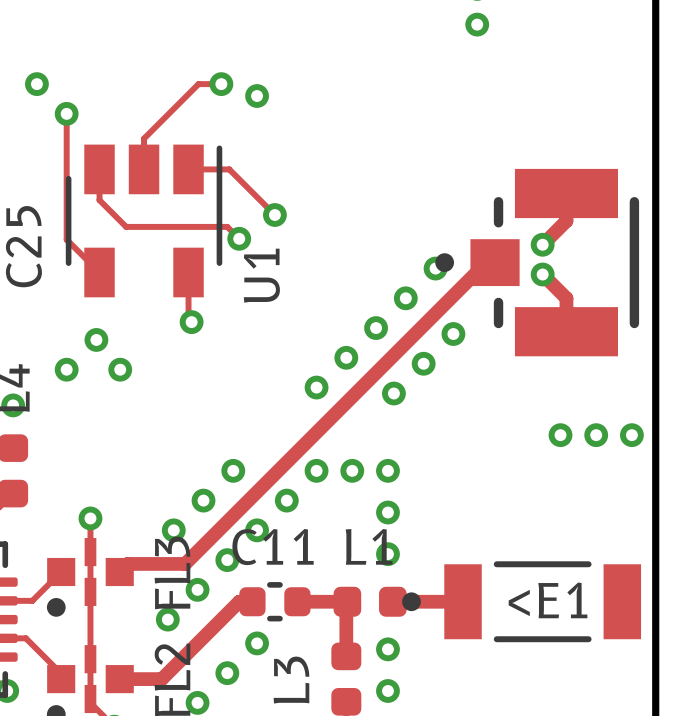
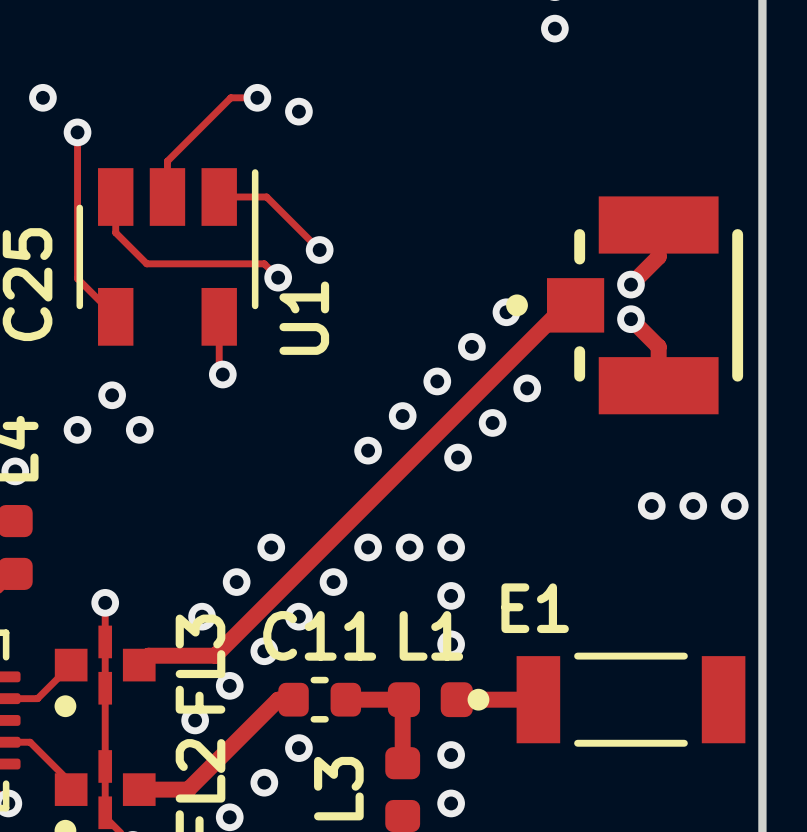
<E1 name: <E1 (548, 600) -> E1 (535, 608)

